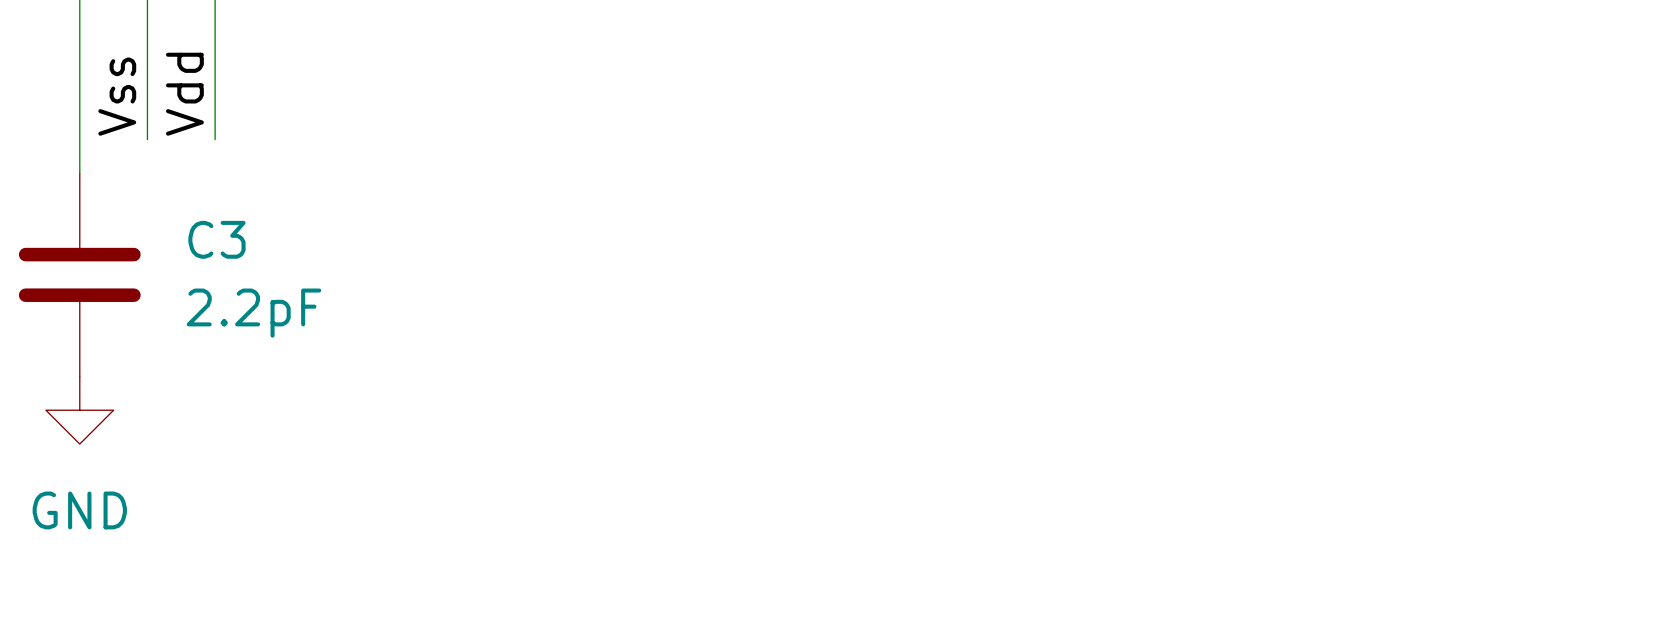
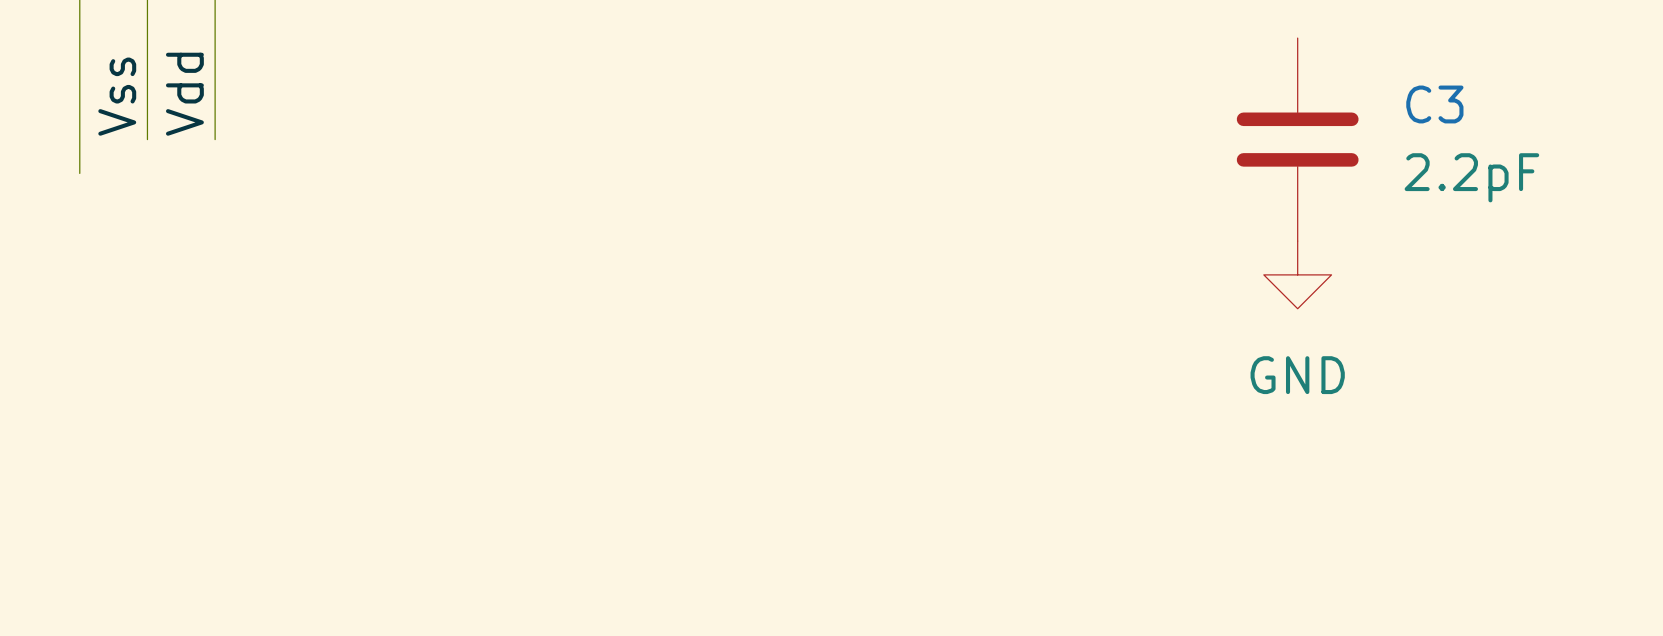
C3 position: (79, 274) -> (1297, 139)
power symbol: none -> GND (1297, 274)
power symbol: GND (79, 410) -> none

